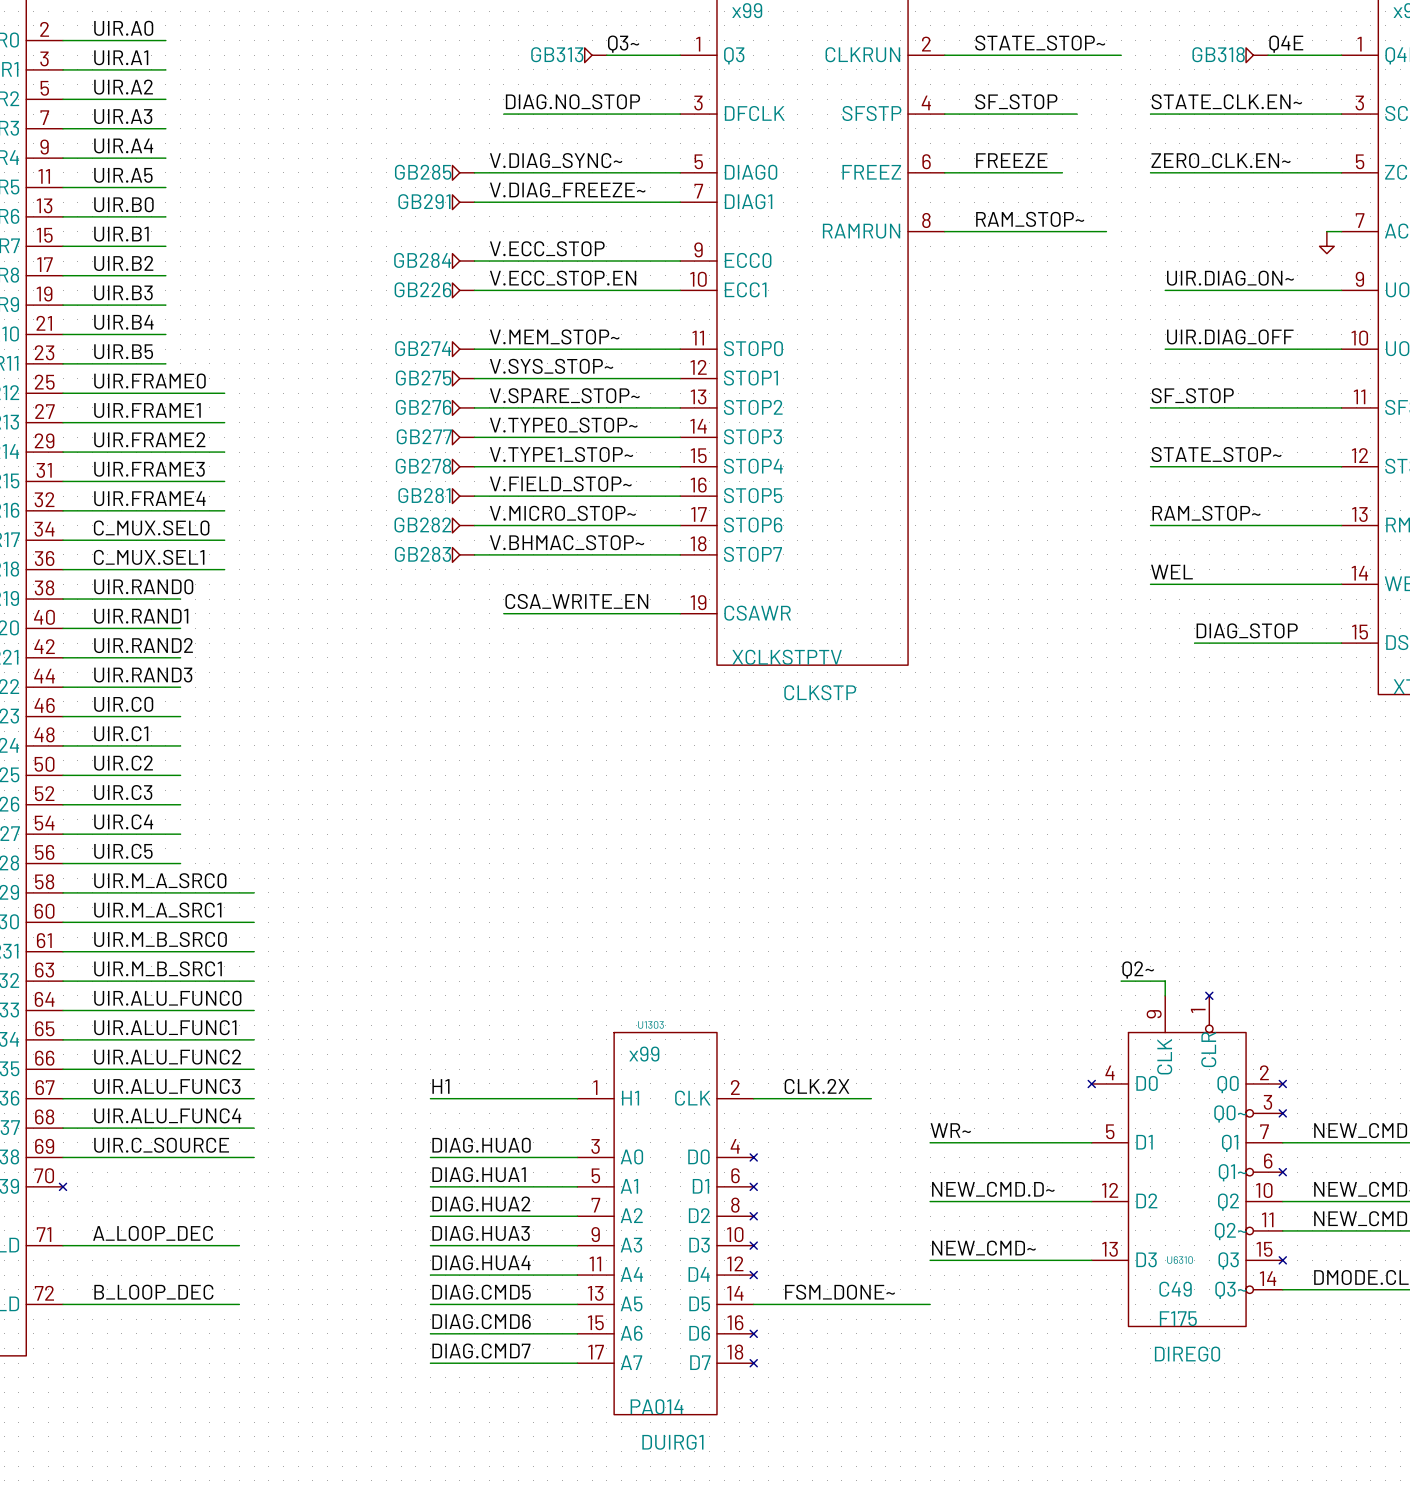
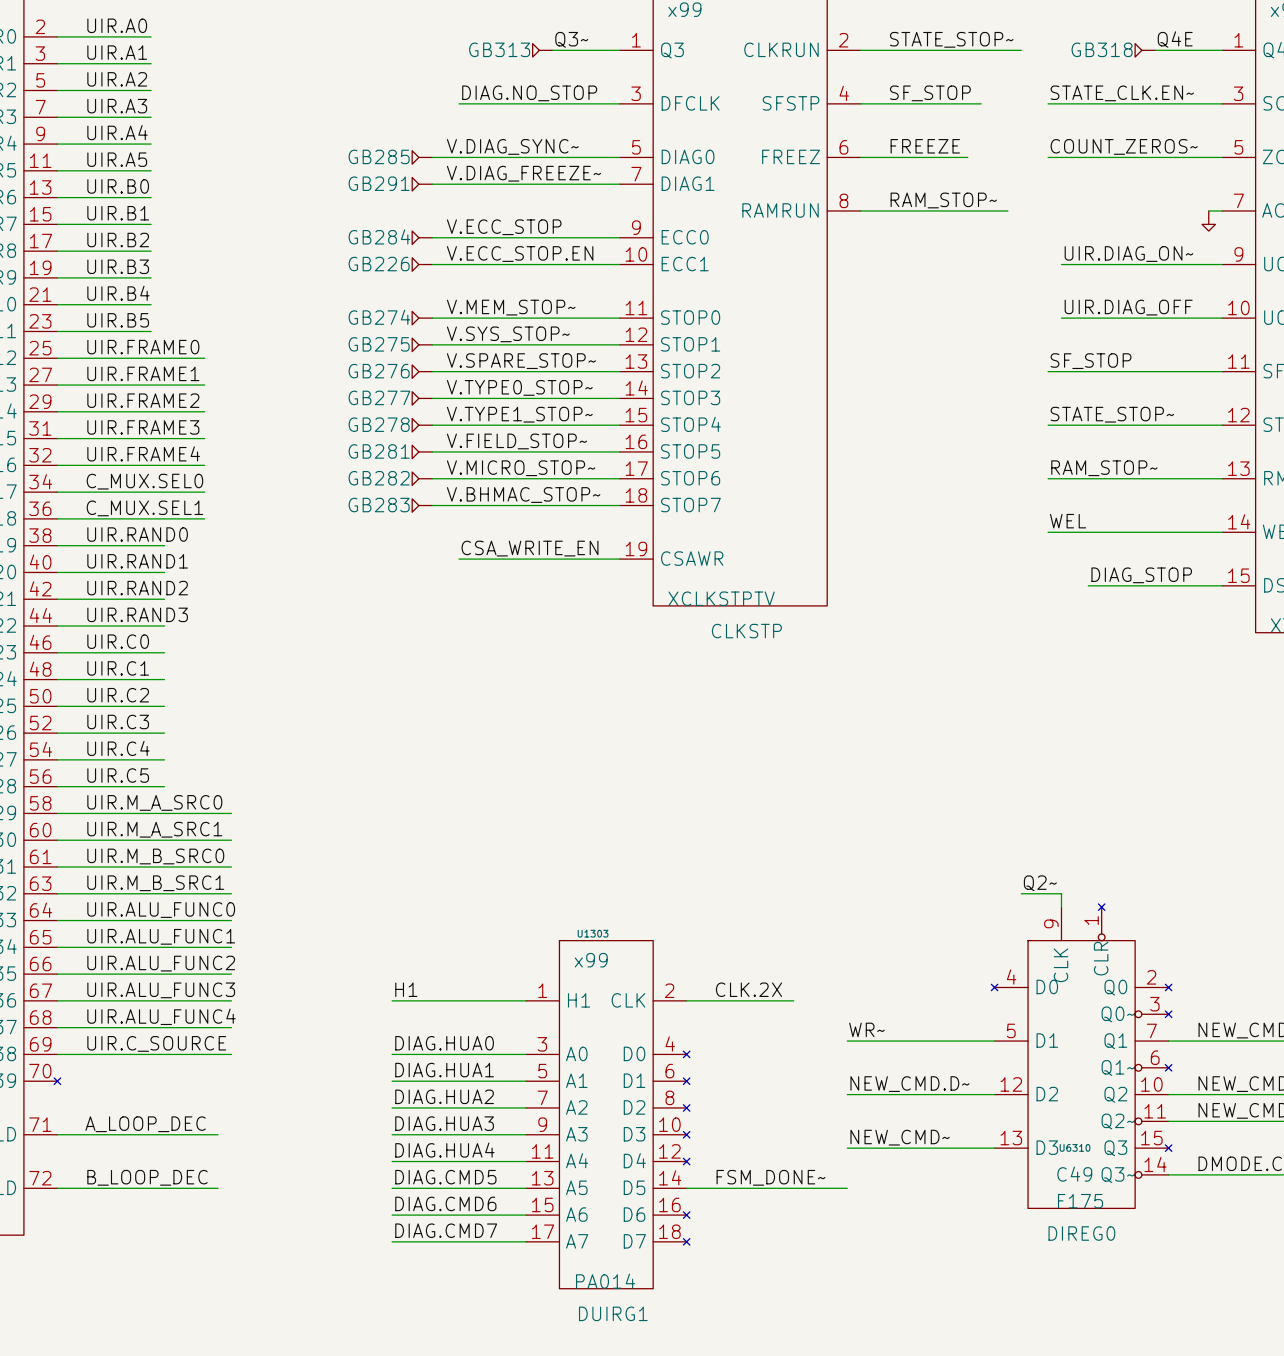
label: ZERO_CLK.EN~ (1221, 160) -> COUNT_ZEROS~ (1124, 146)

